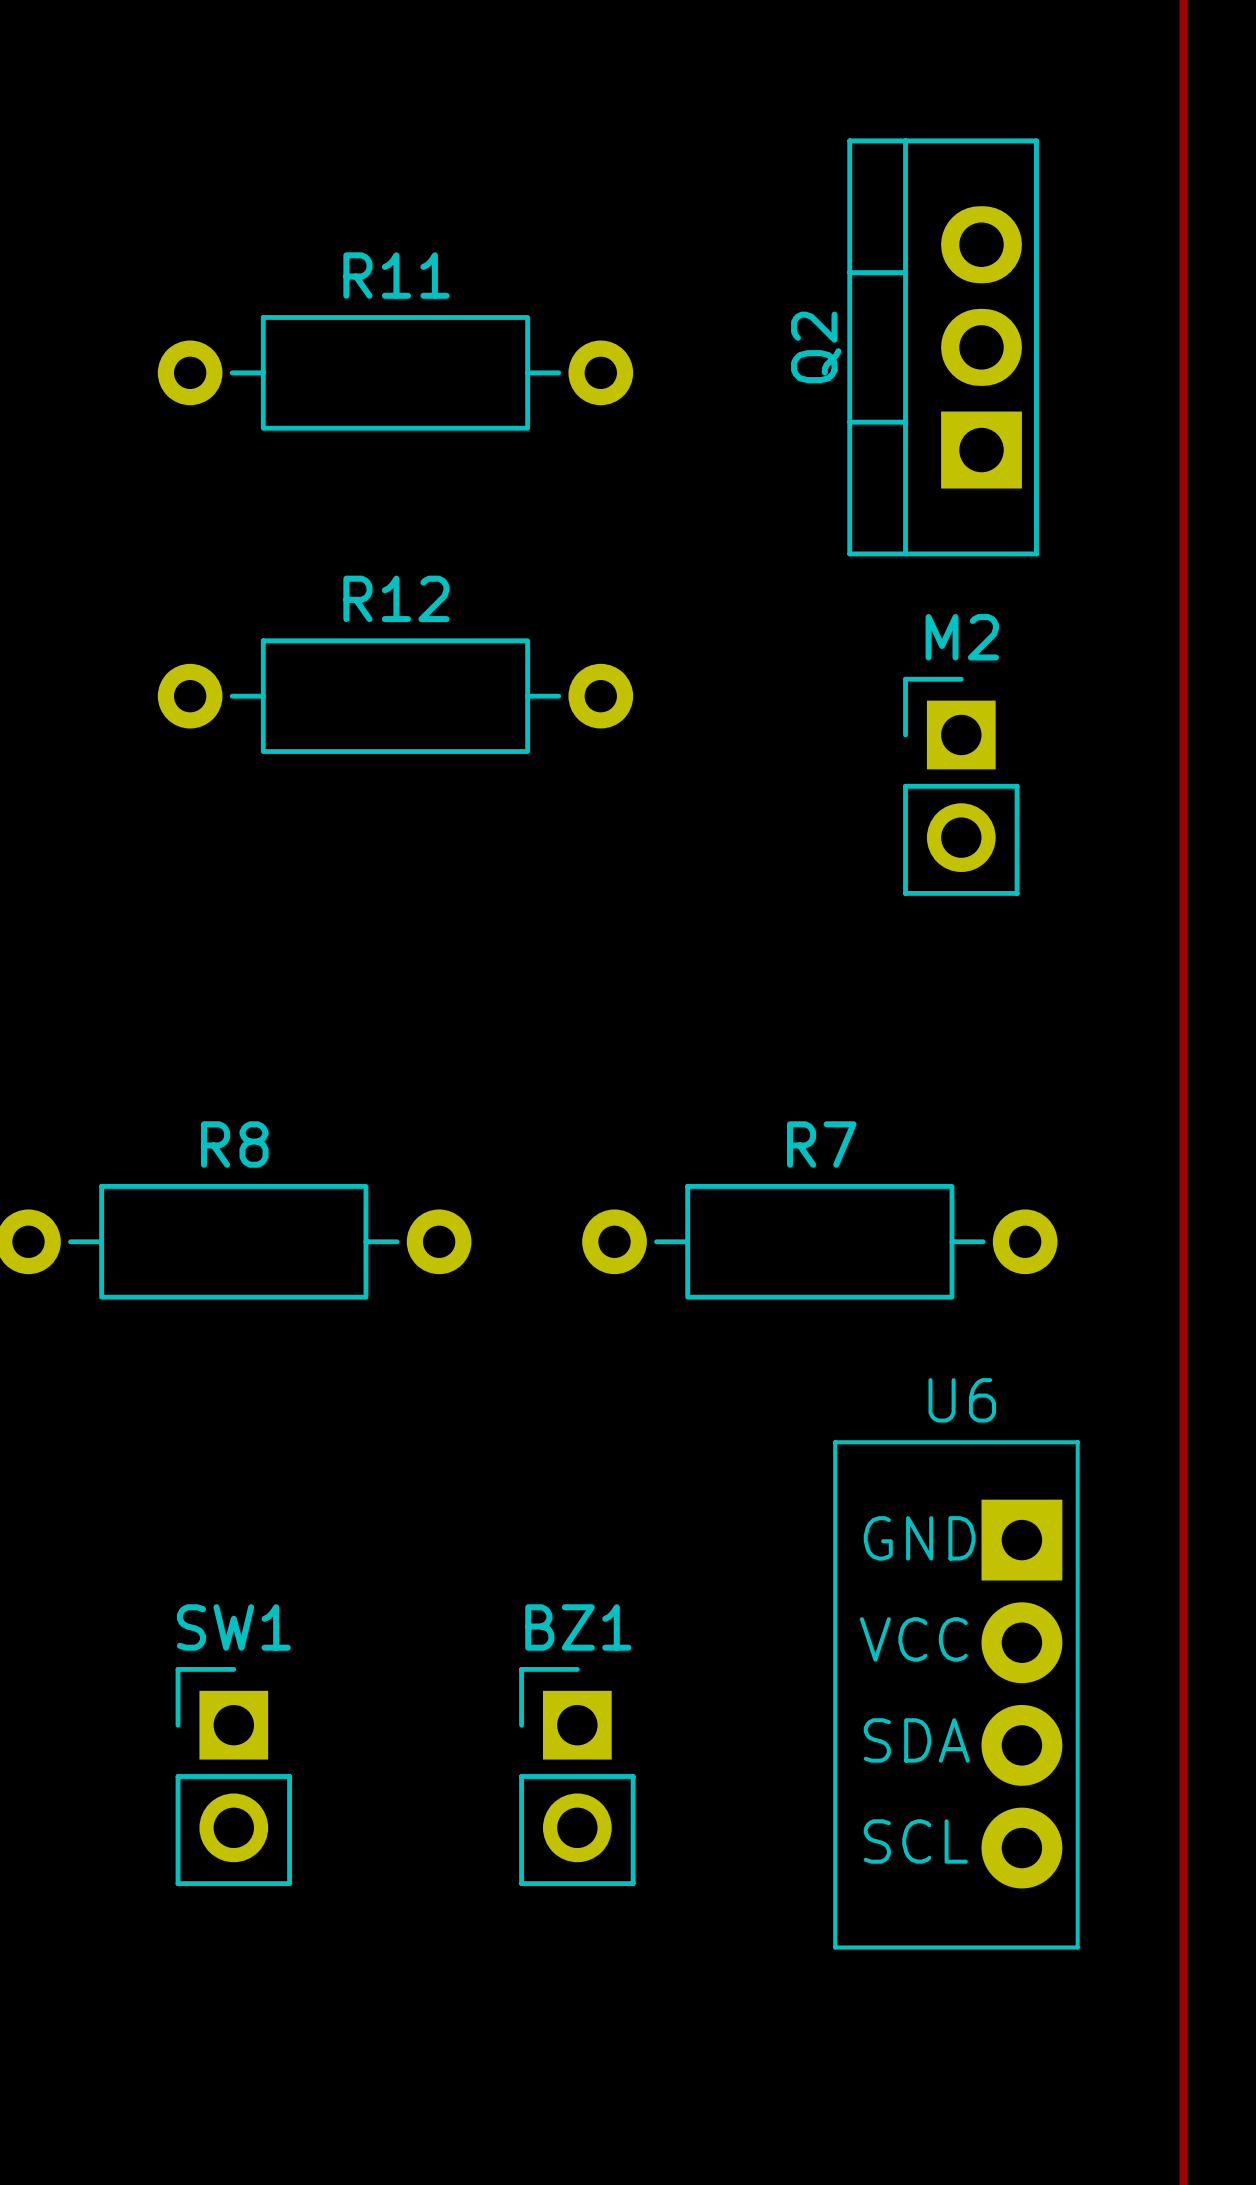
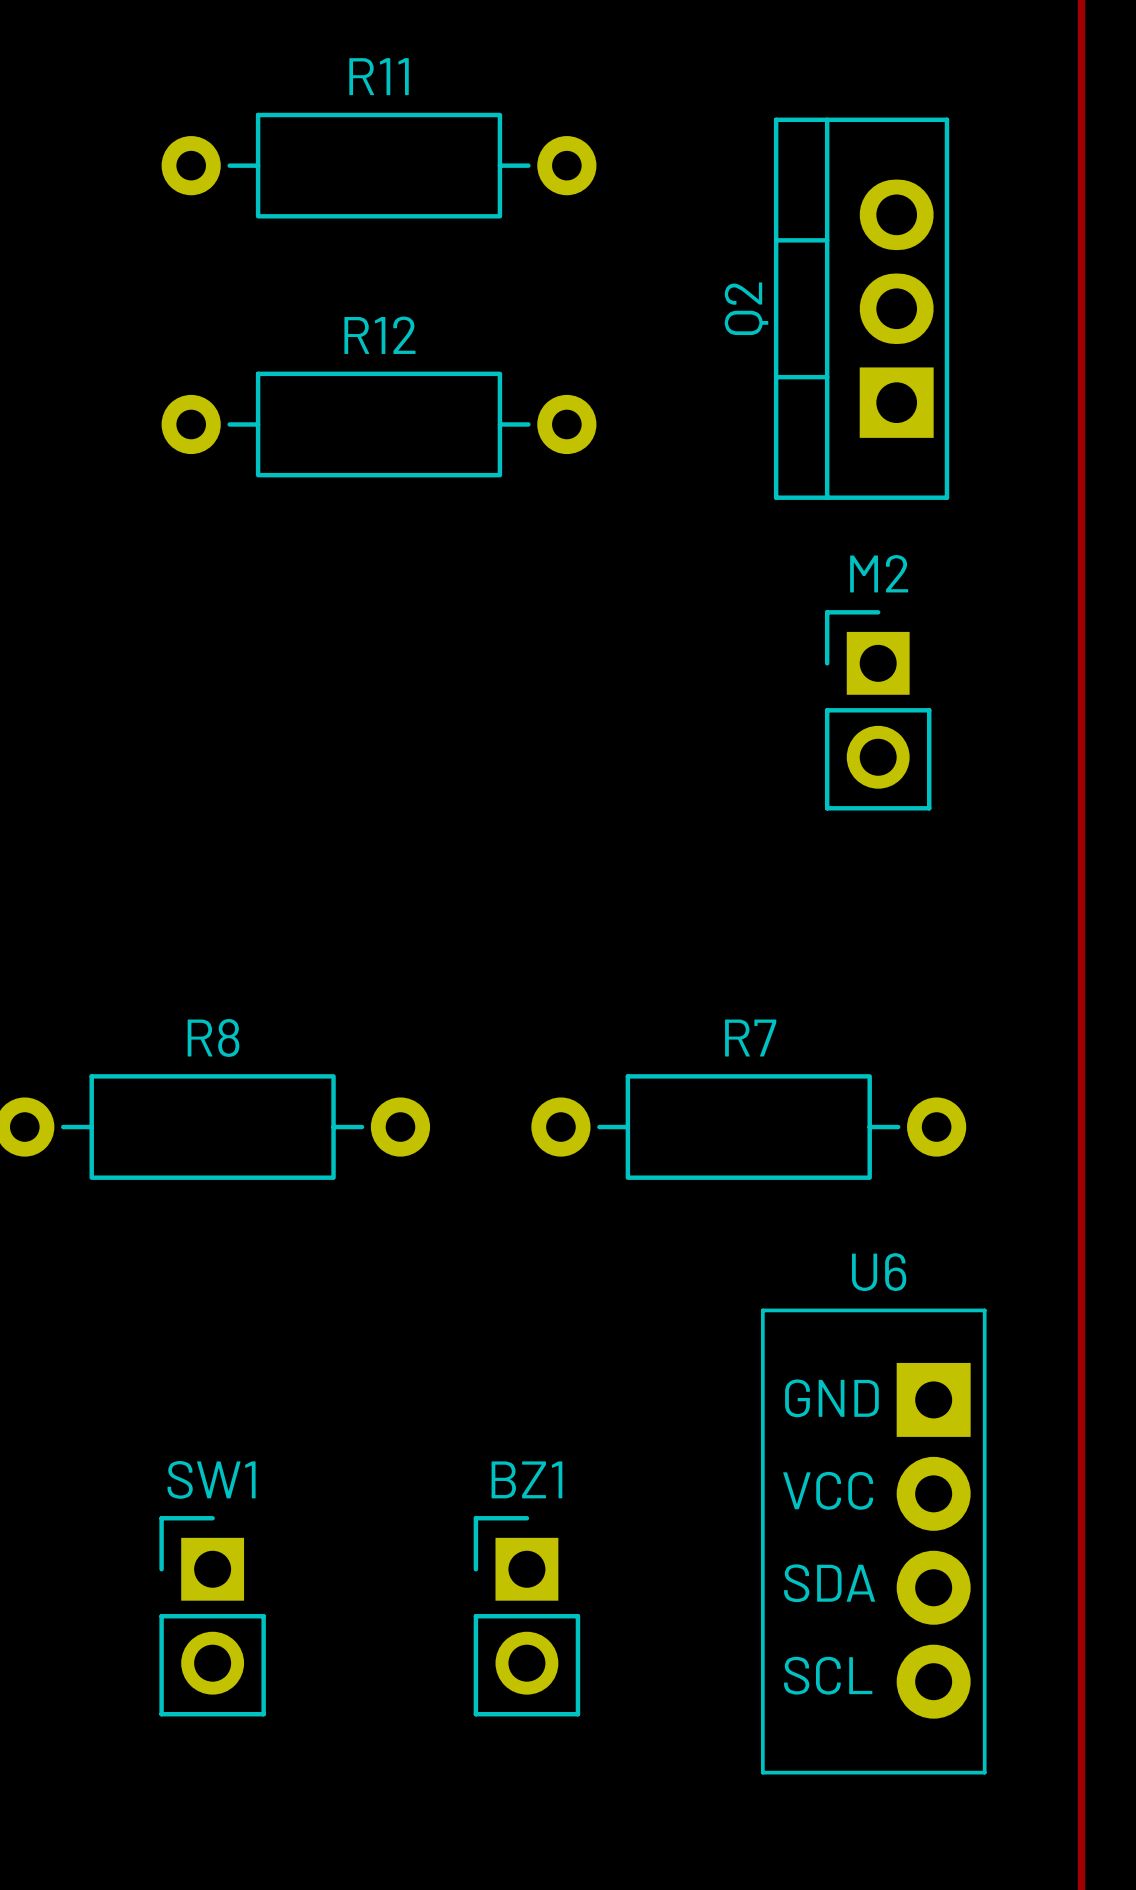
R11 position: (395, 372) -> (379, 165)
R12 position: (395, 696) -> (379, 424)

